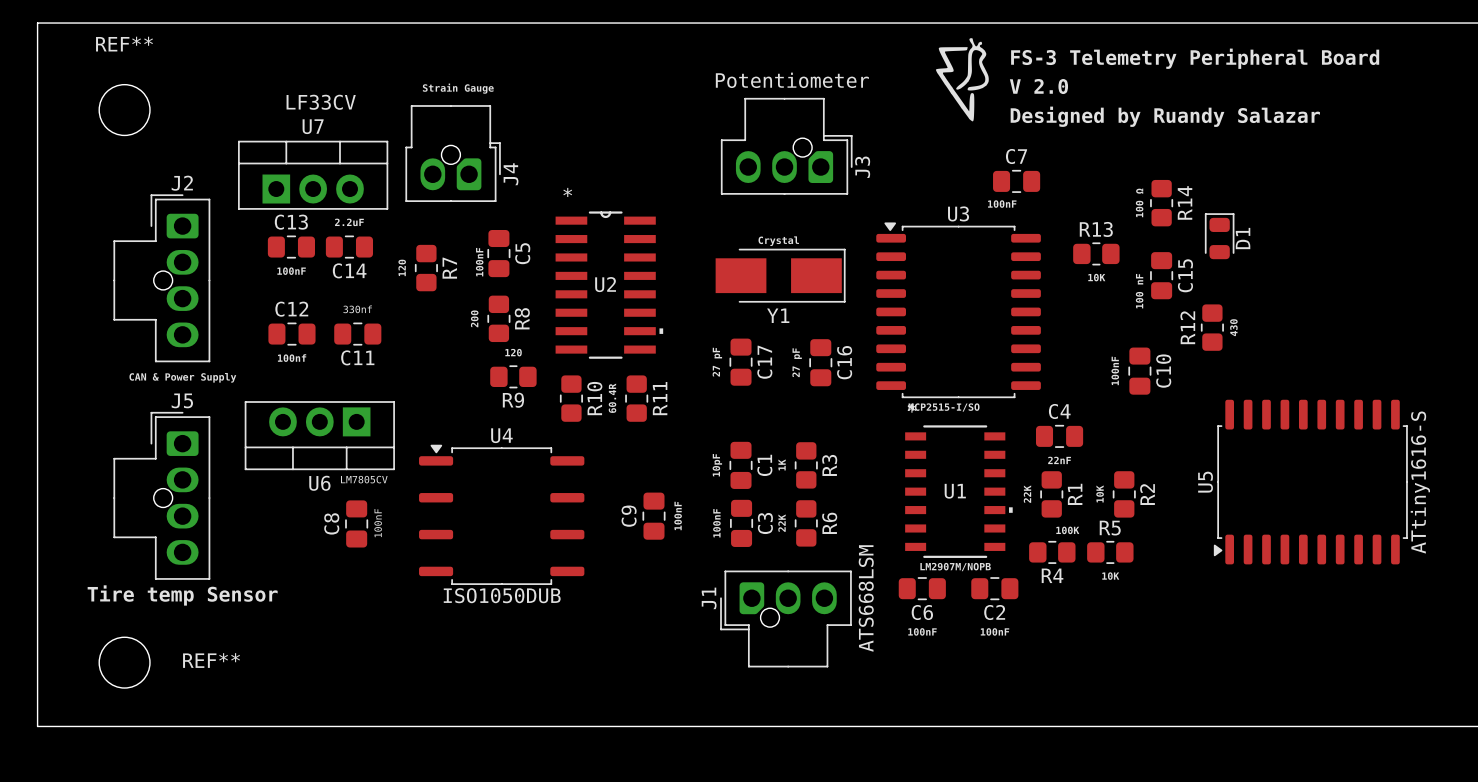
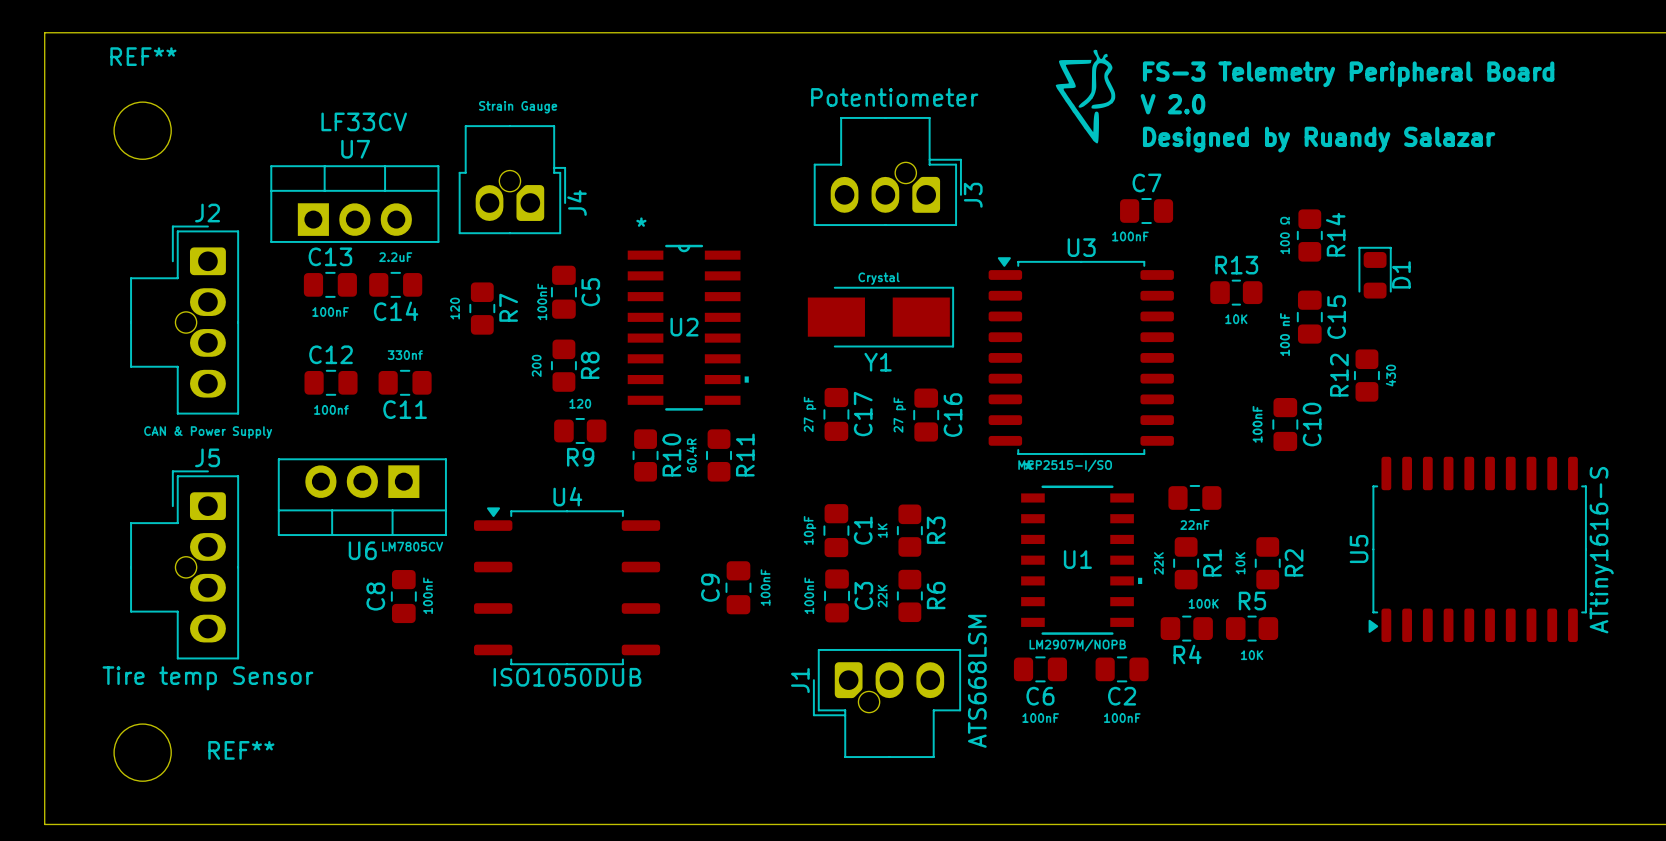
C4 name: C4 (1059, 411) -> none

